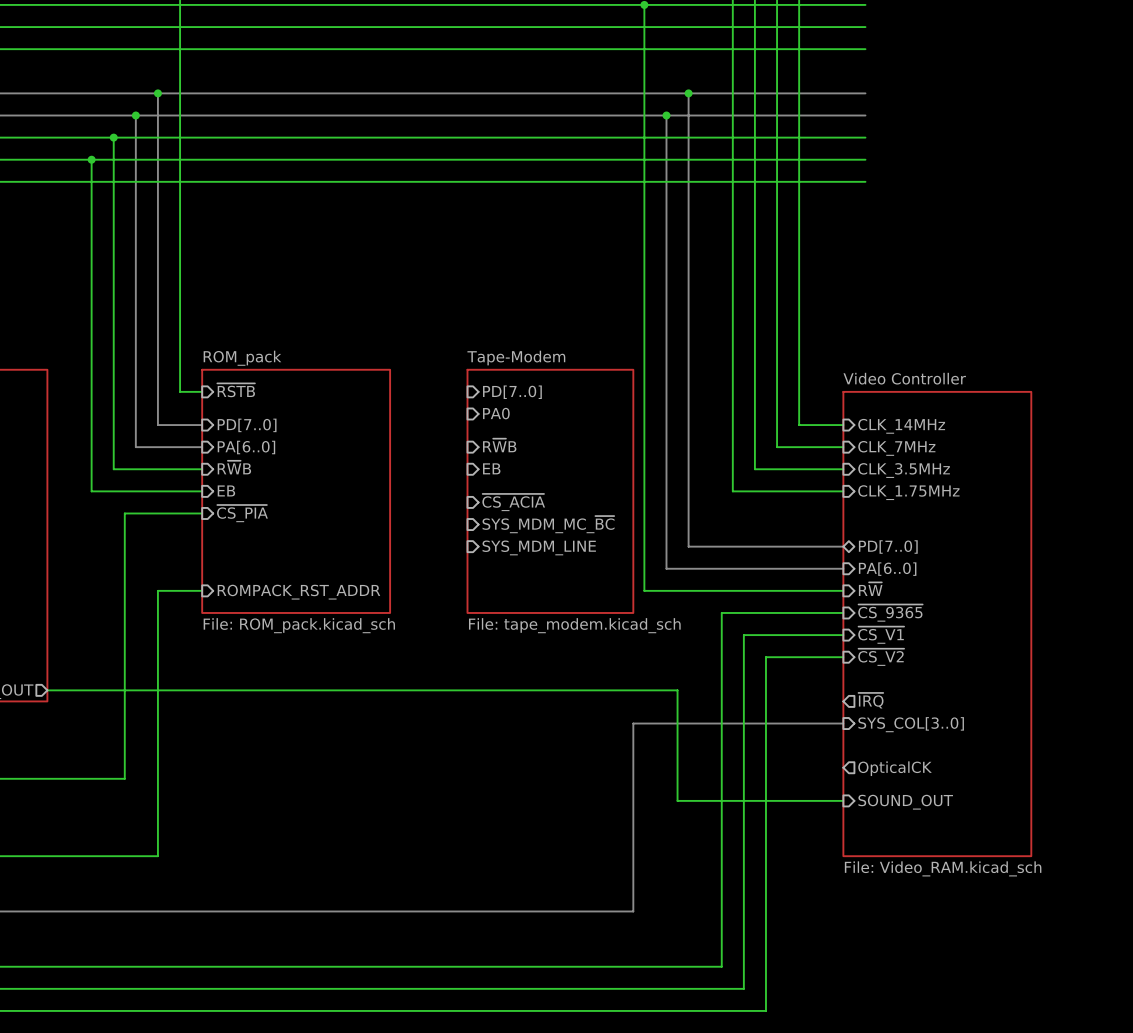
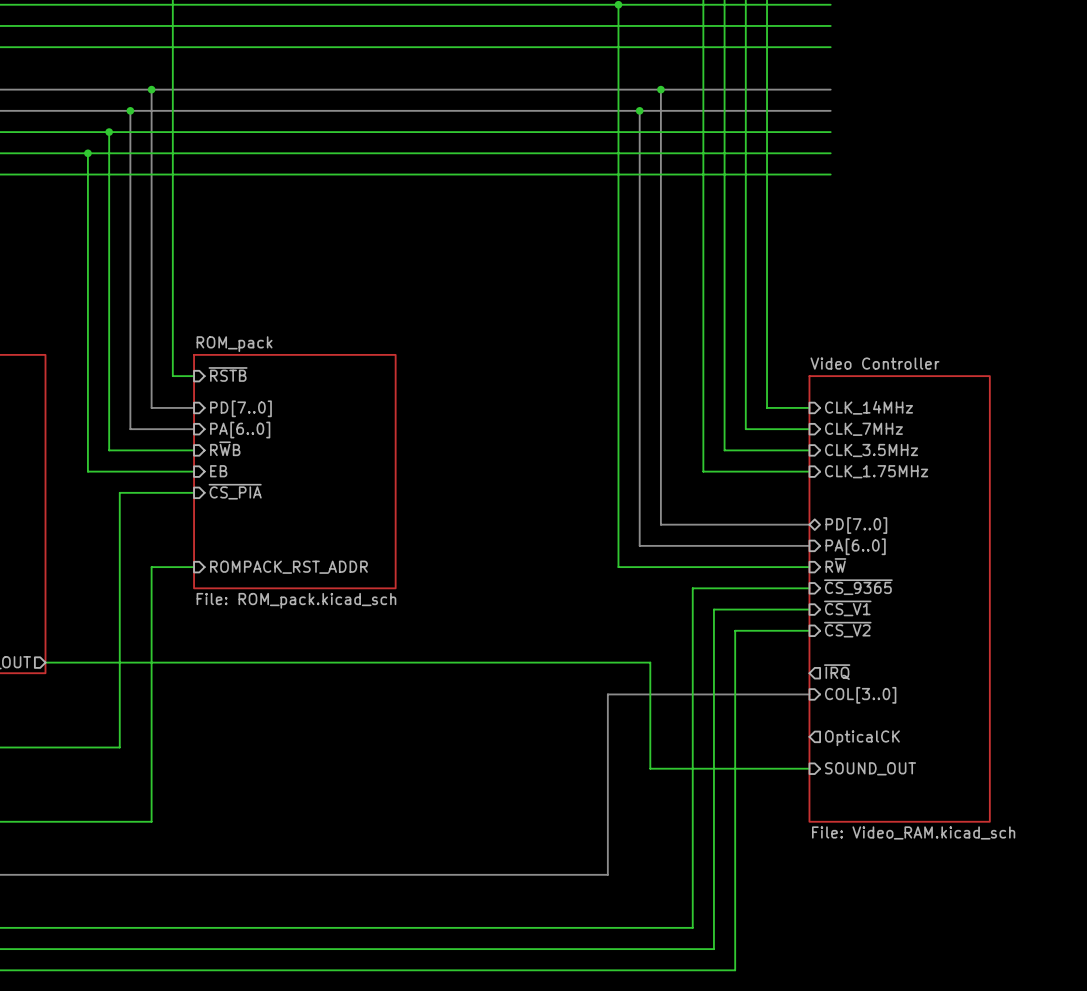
sheet pin: PD[7..0] (512, 392) -> none
sheet pin: PA0 (496, 413) -> none
sheet pin: R~{W}B (499, 445) -> none
sheet pin: EB (491, 468) -> none
sheet ROM_pack: File: ROM_pack.kicad_sch (296, 491) -> none
sheet ROM_pack: none -> File: ROM_pack.kicad_sch (294, 471)
sheet Tape-Modem: File: tape_modem.kicad_sch (550, 491) -> none
sheet pin: ~{CS_ACIA} (513, 502) -> none
sheet pin: SYS_MDM_MC_~{BC} (548, 524) -> none
sheet pin: SYS_MDM_LINE (539, 547) -> none
sheet pin: SYS_COL[3..0] (911, 724) -> COL[3..0] (860, 695)

